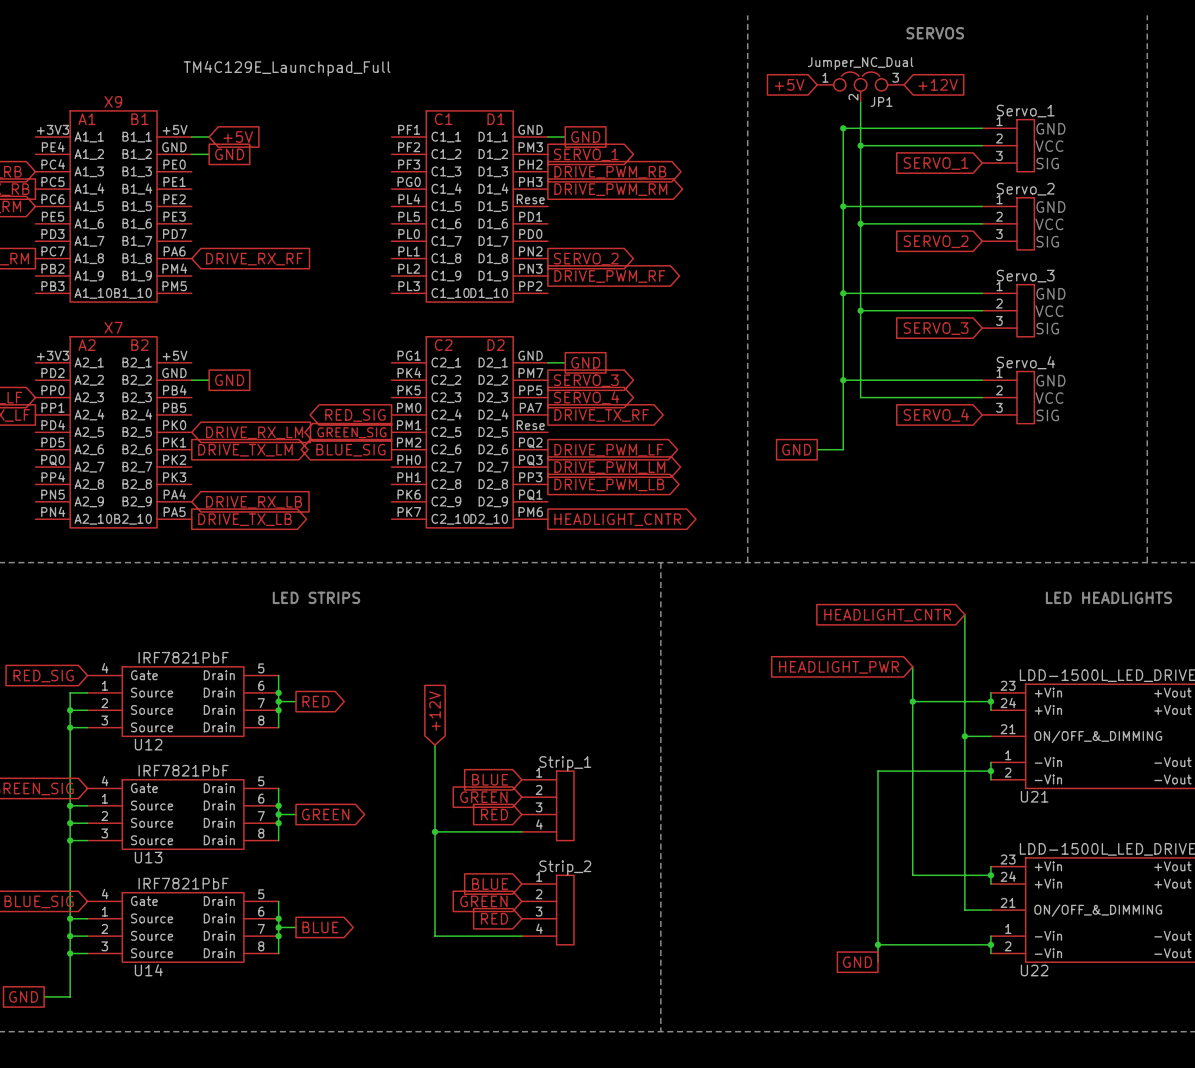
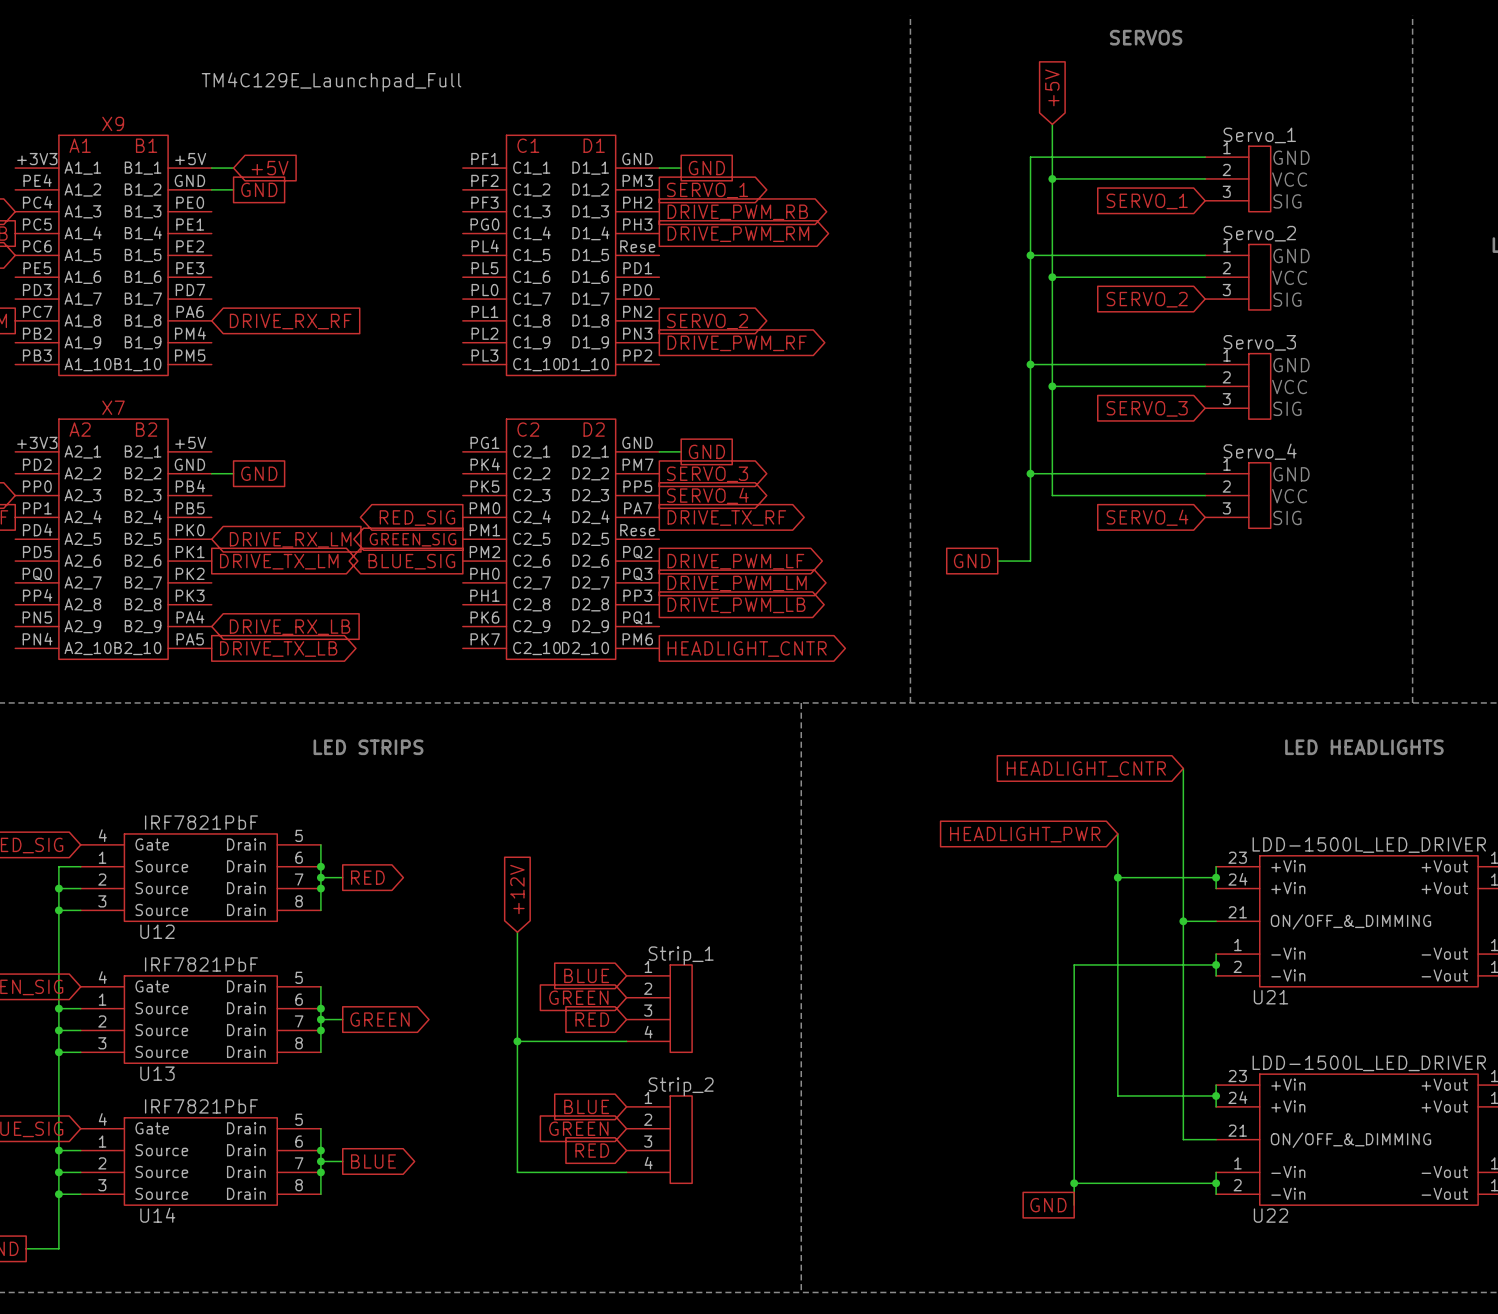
global label rotation: 0° (789, 84) -> 90° clockwise (1052, 87)
global label position: +5V (789, 84) -> +5V (1052, 87)
global label: +12V (938, 84) -> none
JP1: Jumper_NC_Dual (860, 87) -> none
junction: (843, 128) -> none

